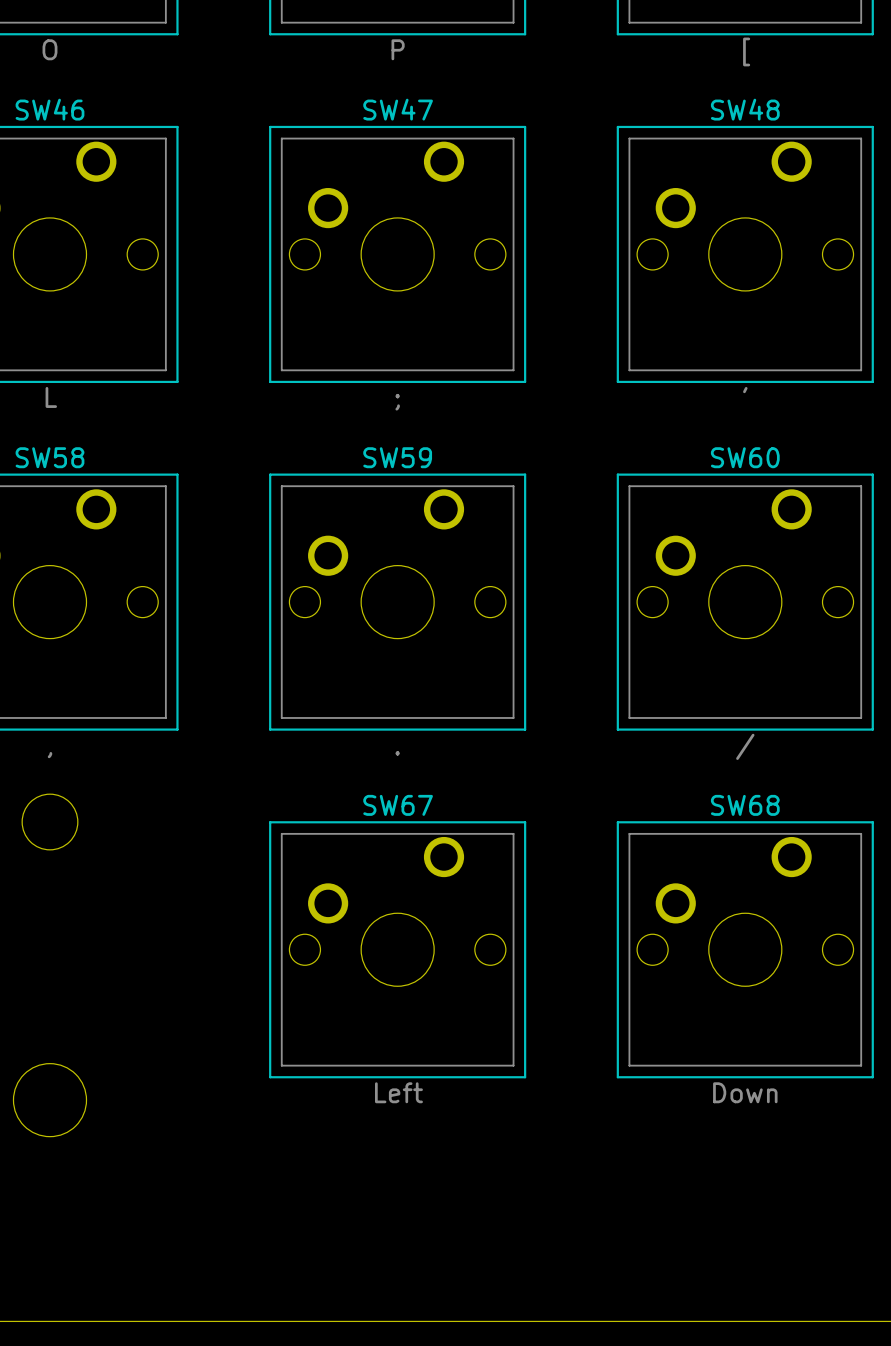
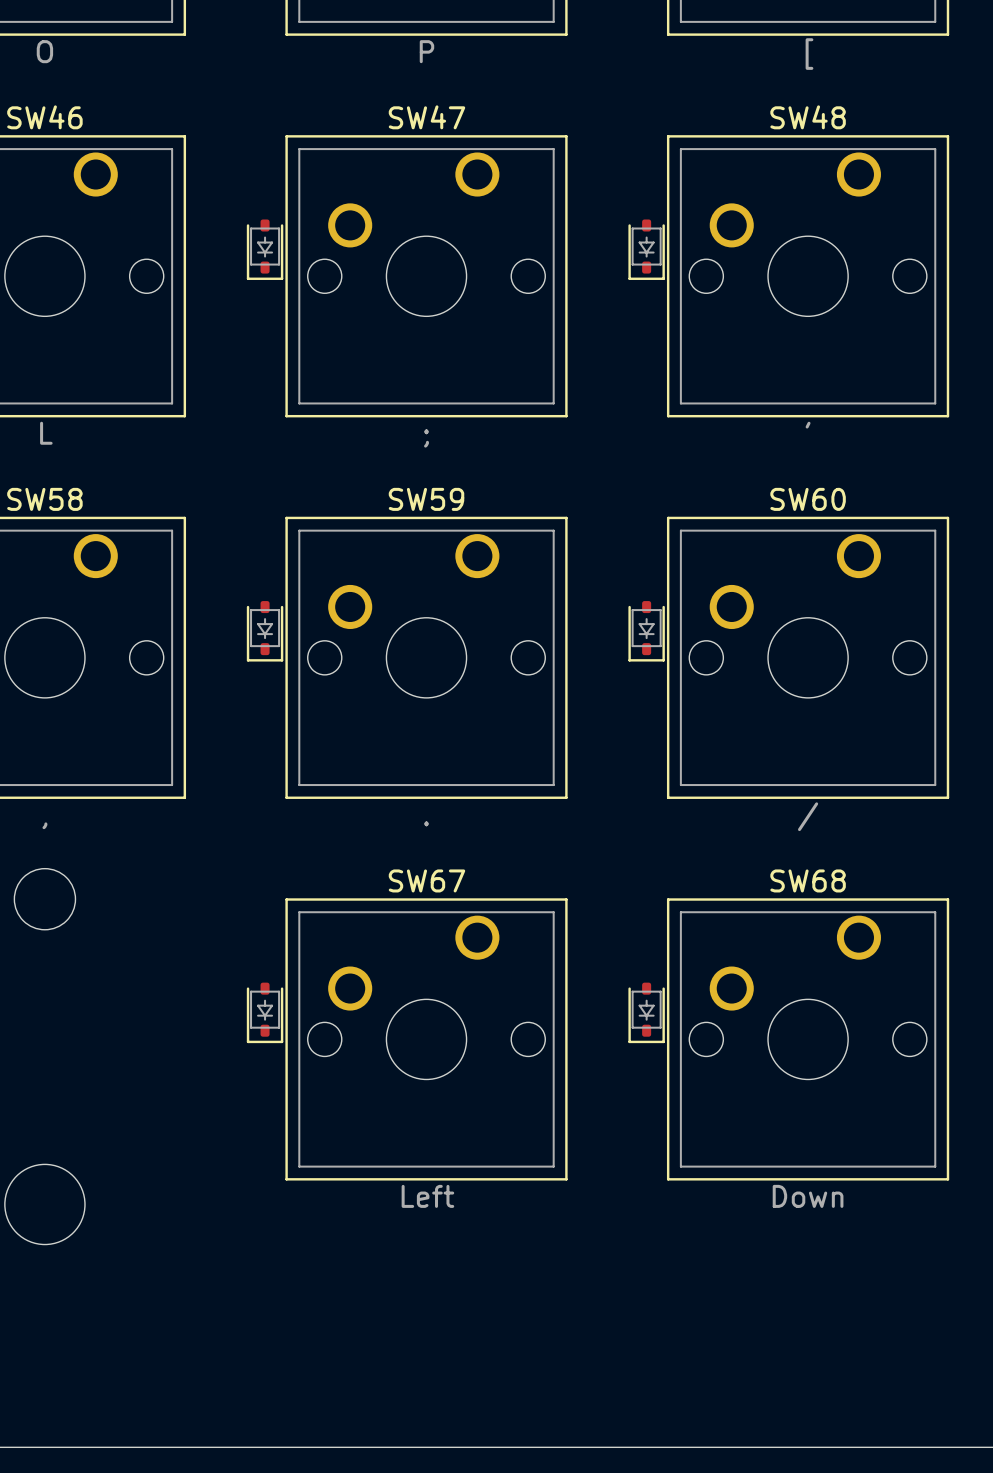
part: none -> (265, 249)
part: none -> (646, 249)
part: none -> (265, 631)
part: none -> (646, 631)
part: none -> (265, 1012)
part: none -> (646, 1012)

